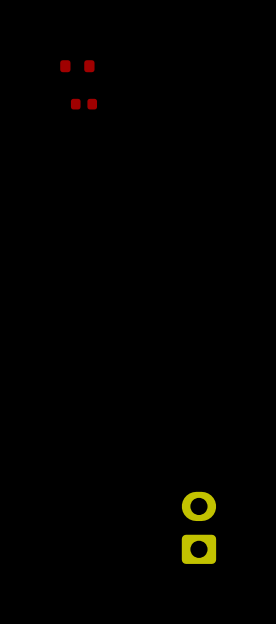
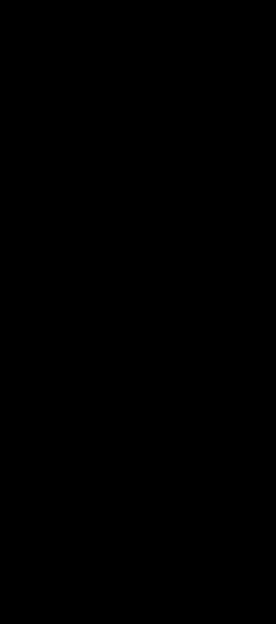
part: (77, 66) -> none
part: (83, 104) -> none
part: (198, 527) -> none

